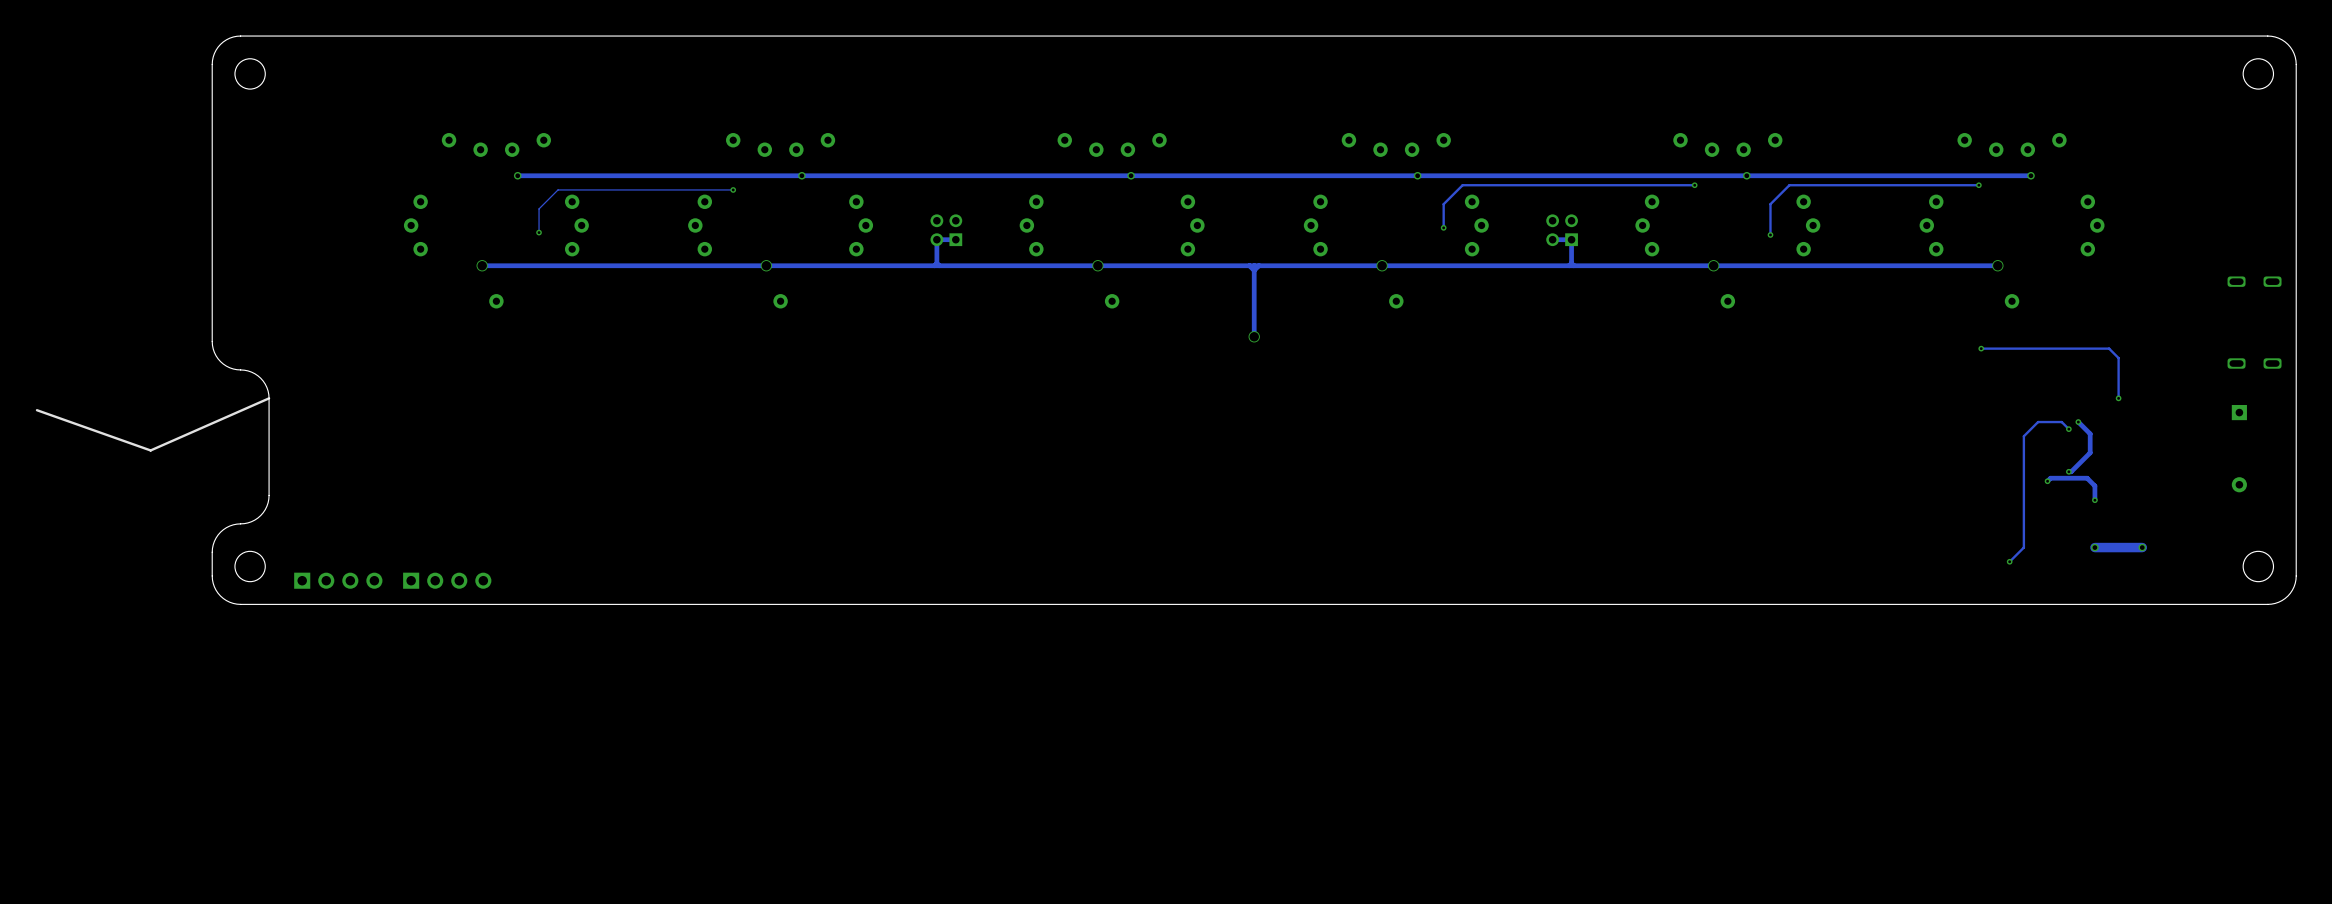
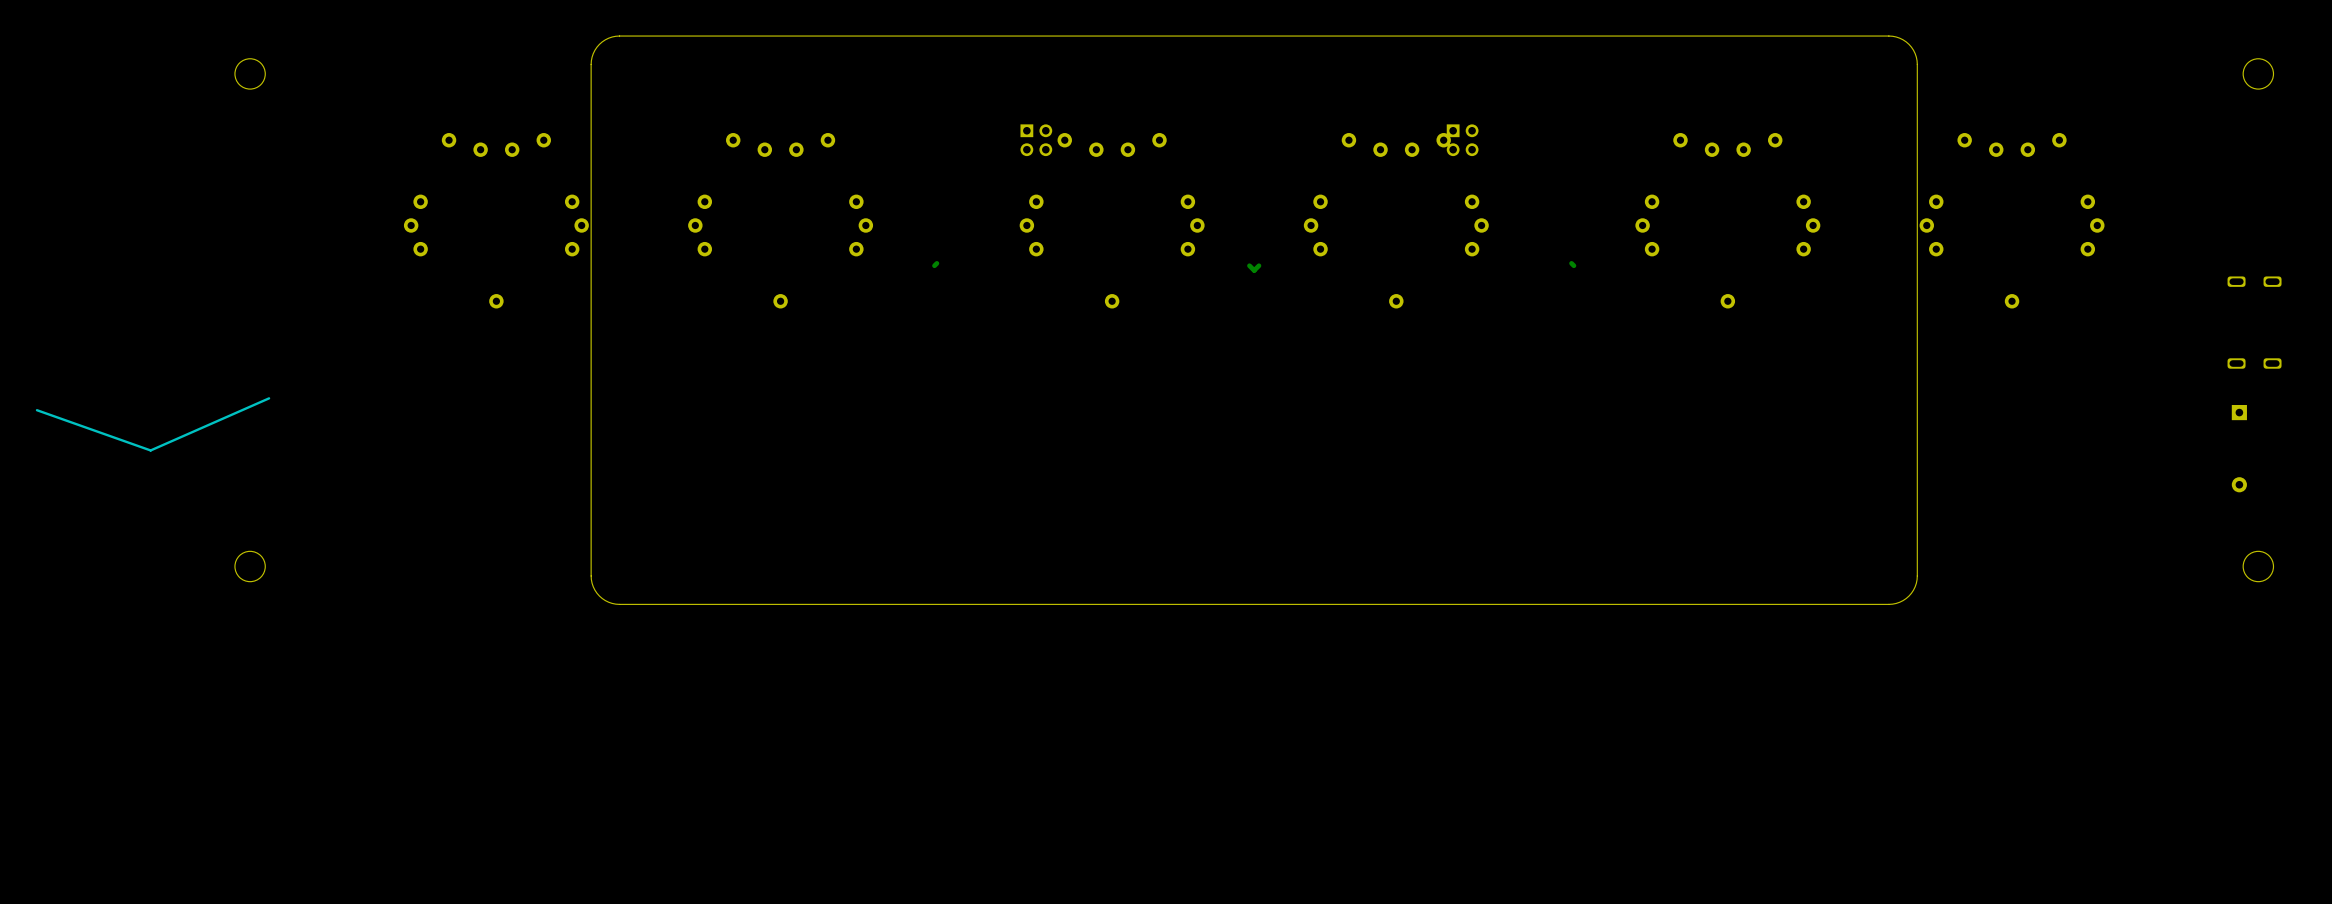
board edge: (619, 36) (236, 36) (226, 39) (218, 47) (212, 64) (212, 345) (216, 355) (223, 364) (233, 368) (251, 372) (260, 378) (266, 387) (269, 398) (268, 502) (257, 518) (248, 522) (229, 526) (216, 538) (212, 548) (212, 575) (218, 593) (226, 600) (240, 604) (619, 604) -> (619, 36) (608, 38) (599, 44) (593, 53) (591, 64) (591, 575) (593, 586) (599, 596) (608, 602) (619, 604)
board edge: (1888, 36) (2271, 36) (2282, 39) (2290, 47) (2296, 64) (2296, 575) (2290, 593) (2282, 600) (2267, 604) (1888, 604) -> (1888, 36) (1899, 38) (1908, 44) (1915, 53) (1917, 64) (1917, 575) (1915, 586) (1908, 596) (1899, 602) (1888, 604)
via: (517, 175) -> none
via: (801, 175) -> none
via: (1131, 175) -> none
via: (1417, 175) -> none
via: (1746, 175) -> none
track: (2030, 175) (517, 175) -> none
via: (2030, 175) -> none
track: (1694, 185) (1462, 185) (1443, 204) (1443, 227) -> none
via: (1694, 185) -> none
track: (1978, 185) (1789, 185) (1770, 204) (1770, 234) -> none
via: (1978, 185) -> none
track: (733, 189) (557, 189) (539, 208) (539, 232) -> none
via: (733, 189) -> none
via: (1443, 227) -> none
part rotation: 0° (946, 230) -> 180° (1036, 140)
part position: (946, 230) -> (1036, 140)
part rotation: 0° (1562, 230) -> 180° (1462, 140)
part position: (1562, 230) -> (1462, 140)
via: (539, 232) -> none
via: (1770, 234) -> none
track: (955, 239) (936, 239) (936, 263) (939, 265) -> none
track: (1552, 239) (1571, 239) (1571, 263) (1569, 265) -> none
via: (482, 265) -> none
via: (766, 265) -> none
via: (1097, 265) -> none
track: (1254, 265) (1254, 336) -> none
via: (1382, 265) -> none
via: (1713, 265) -> none
via: (1997, 265) -> none
track: (2000, 265) (482, 265) -> none
via: (1254, 336) -> none
track: (1981, 348) (2109, 348) (2118, 358) (2118, 398) -> none
via: (1981, 348) -> none
via: (2118, 398) -> none
track: (2078, 422) (2090, 433) (2090, 452) (2071, 471) (2068, 471) -> none
via: (2078, 422) -> none
track: (2068, 429) (2061, 422) (2038, 422) (2023, 436) (2023, 547) (2009, 561) -> none
via: (2068, 429) -> none
via: (2068, 471) -> none
track: (2047, 481) (2050, 478) (2087, 478) (2094, 485) (2094, 500) -> none
via: (2047, 481) -> none
via: (2094, 500) -> none
via: (2094, 547) -> none
track: (2142, 547) (2094, 547) -> none
via: (2142, 547) -> none
via: (2009, 561) -> none
part: (338, 580) -> none
part: (447, 580) -> none

